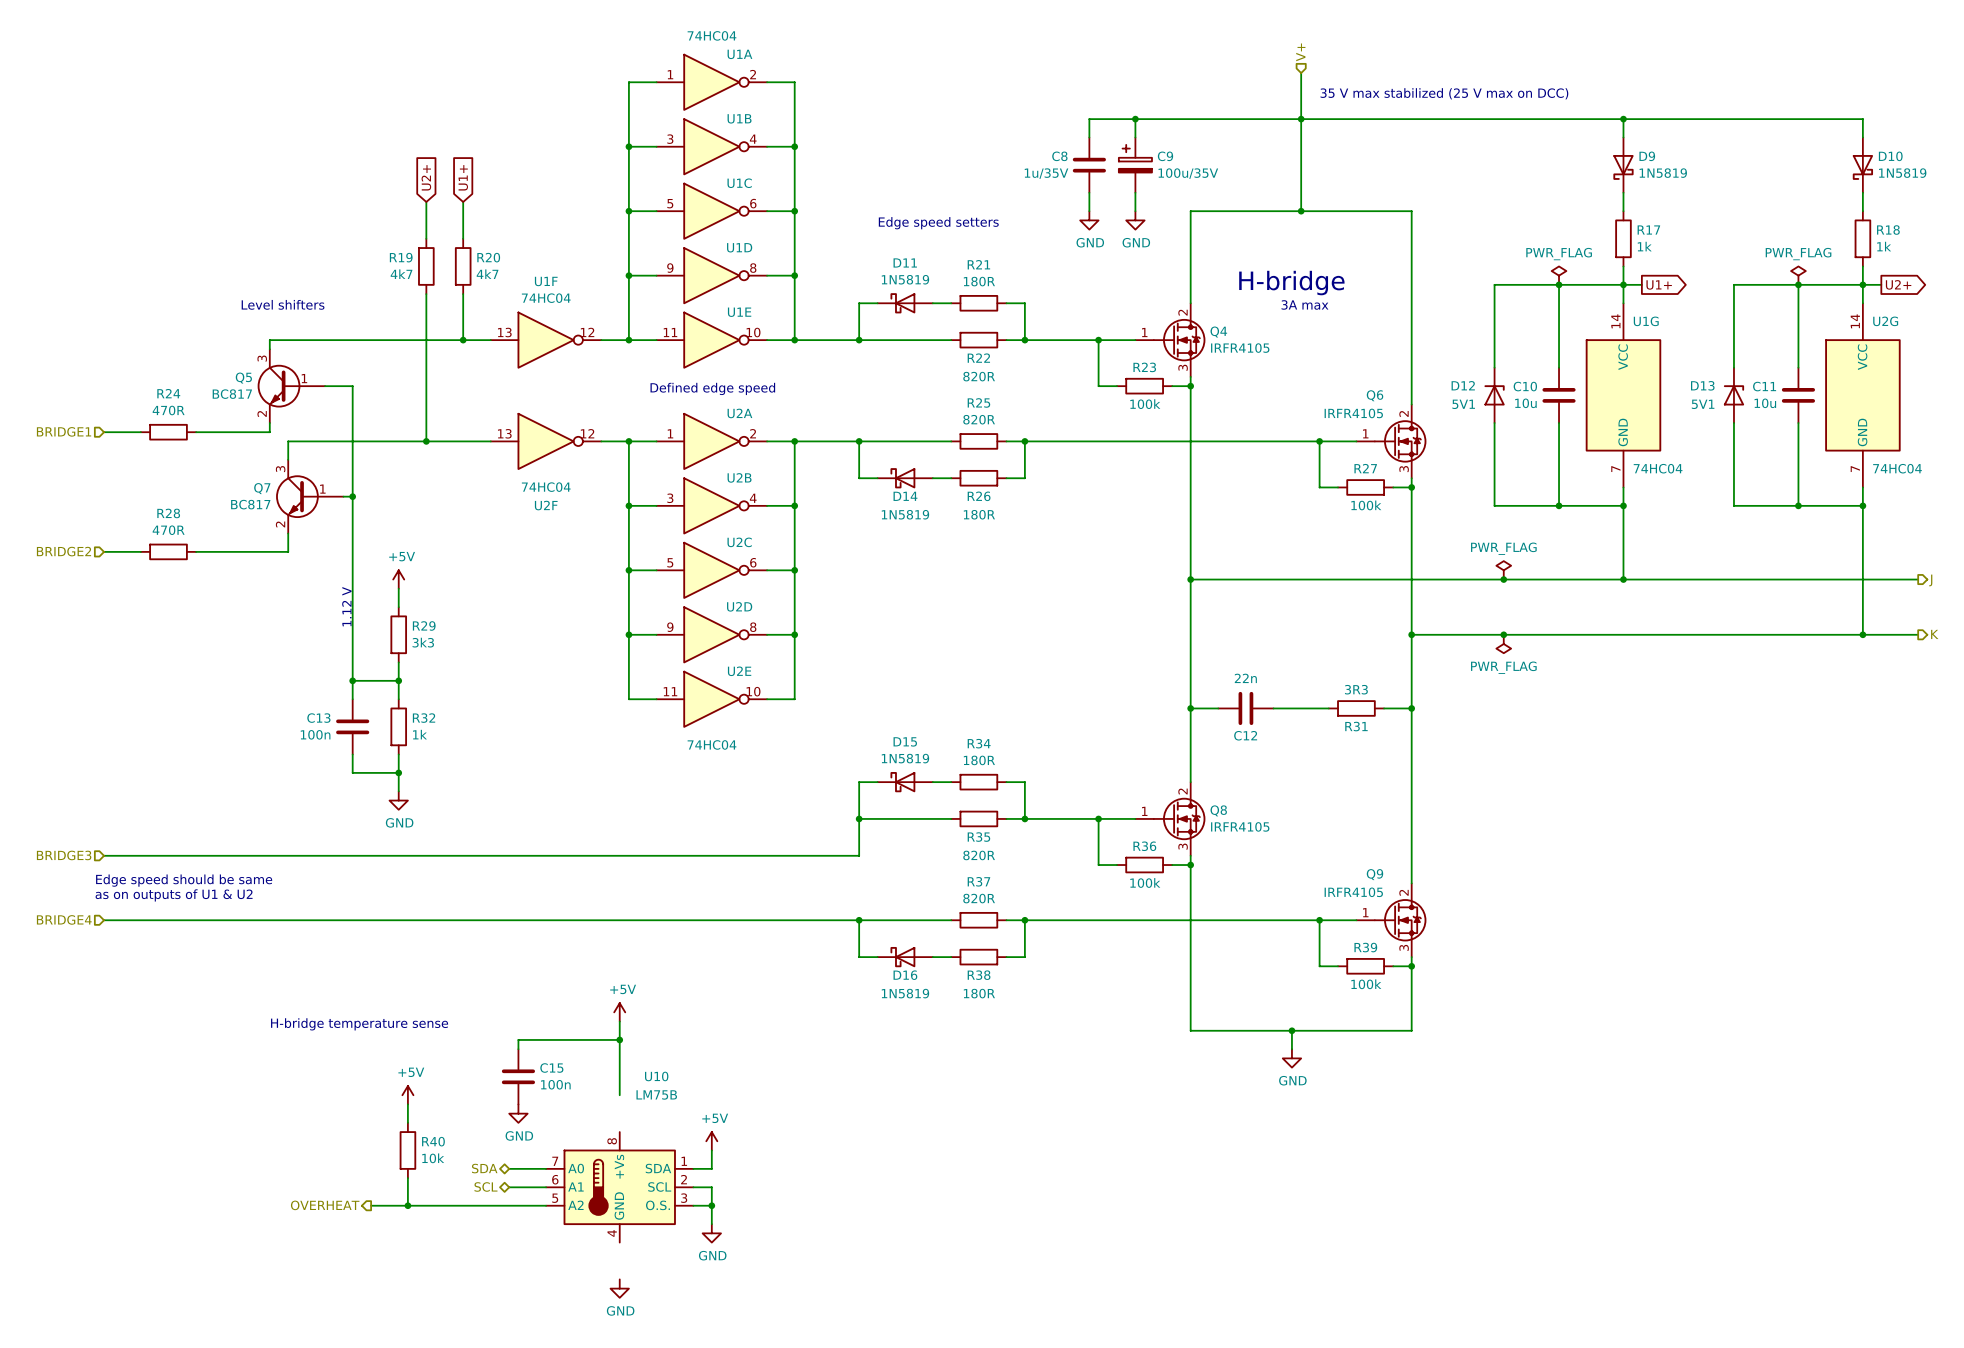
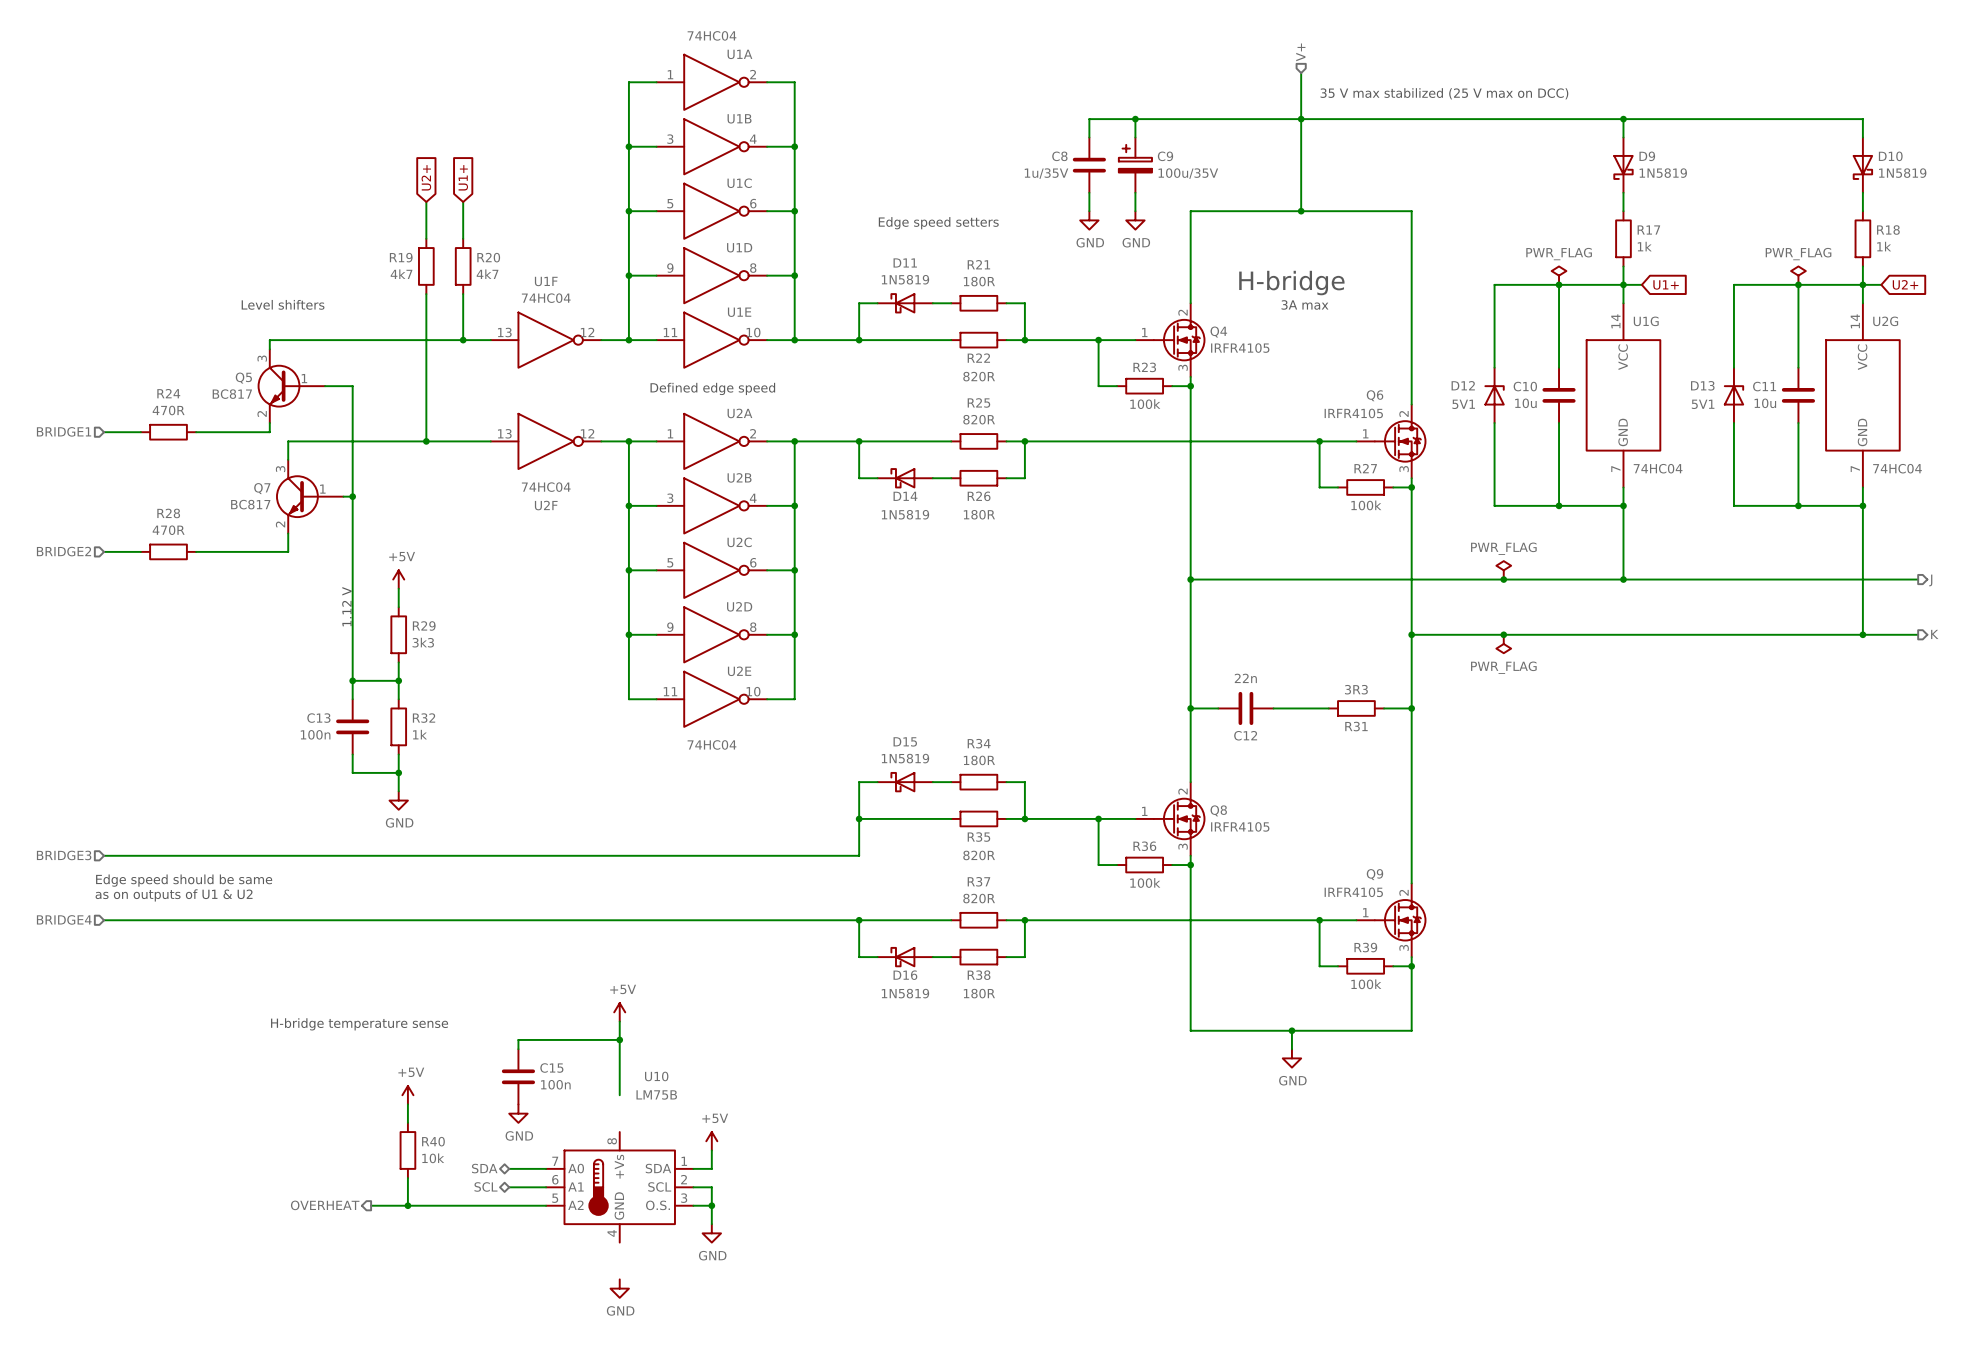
global label shape: output (1659, 284) -> input (1666, 284)
global label shape: output (1898, 284) -> input (1905, 284)

